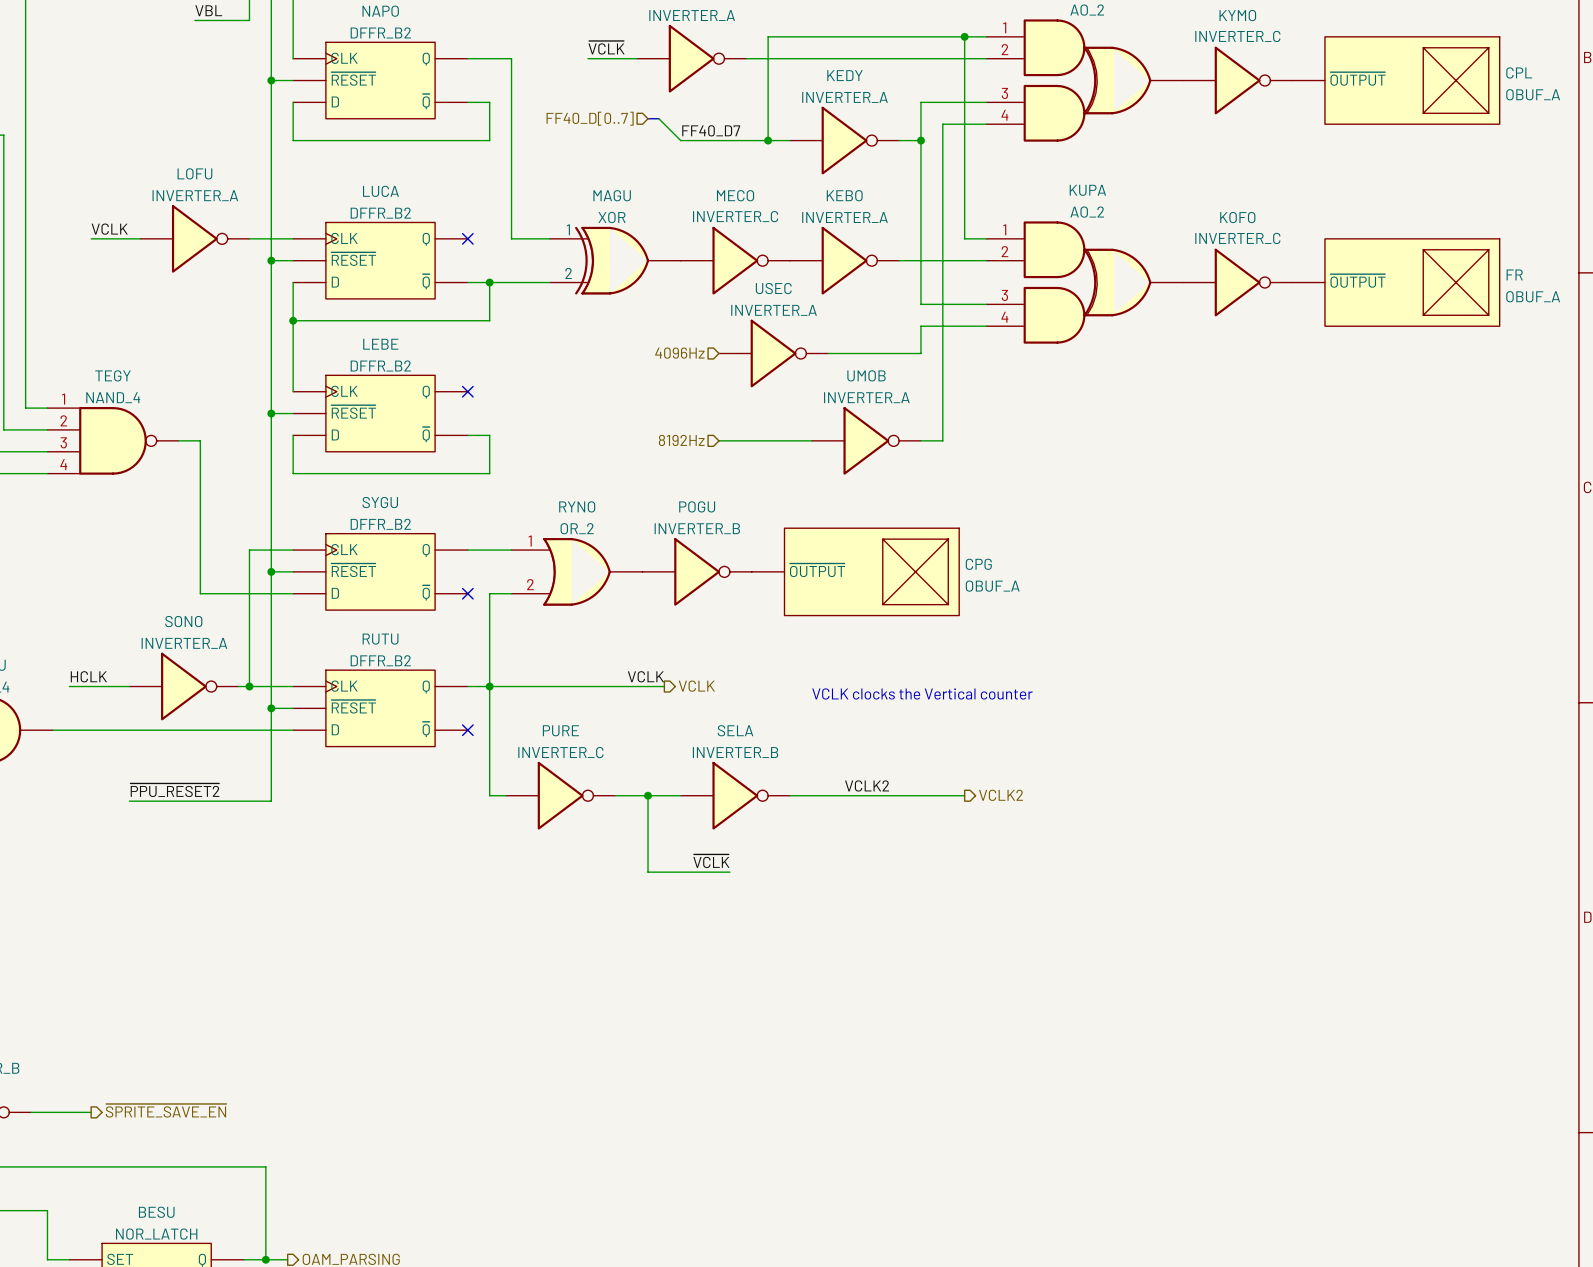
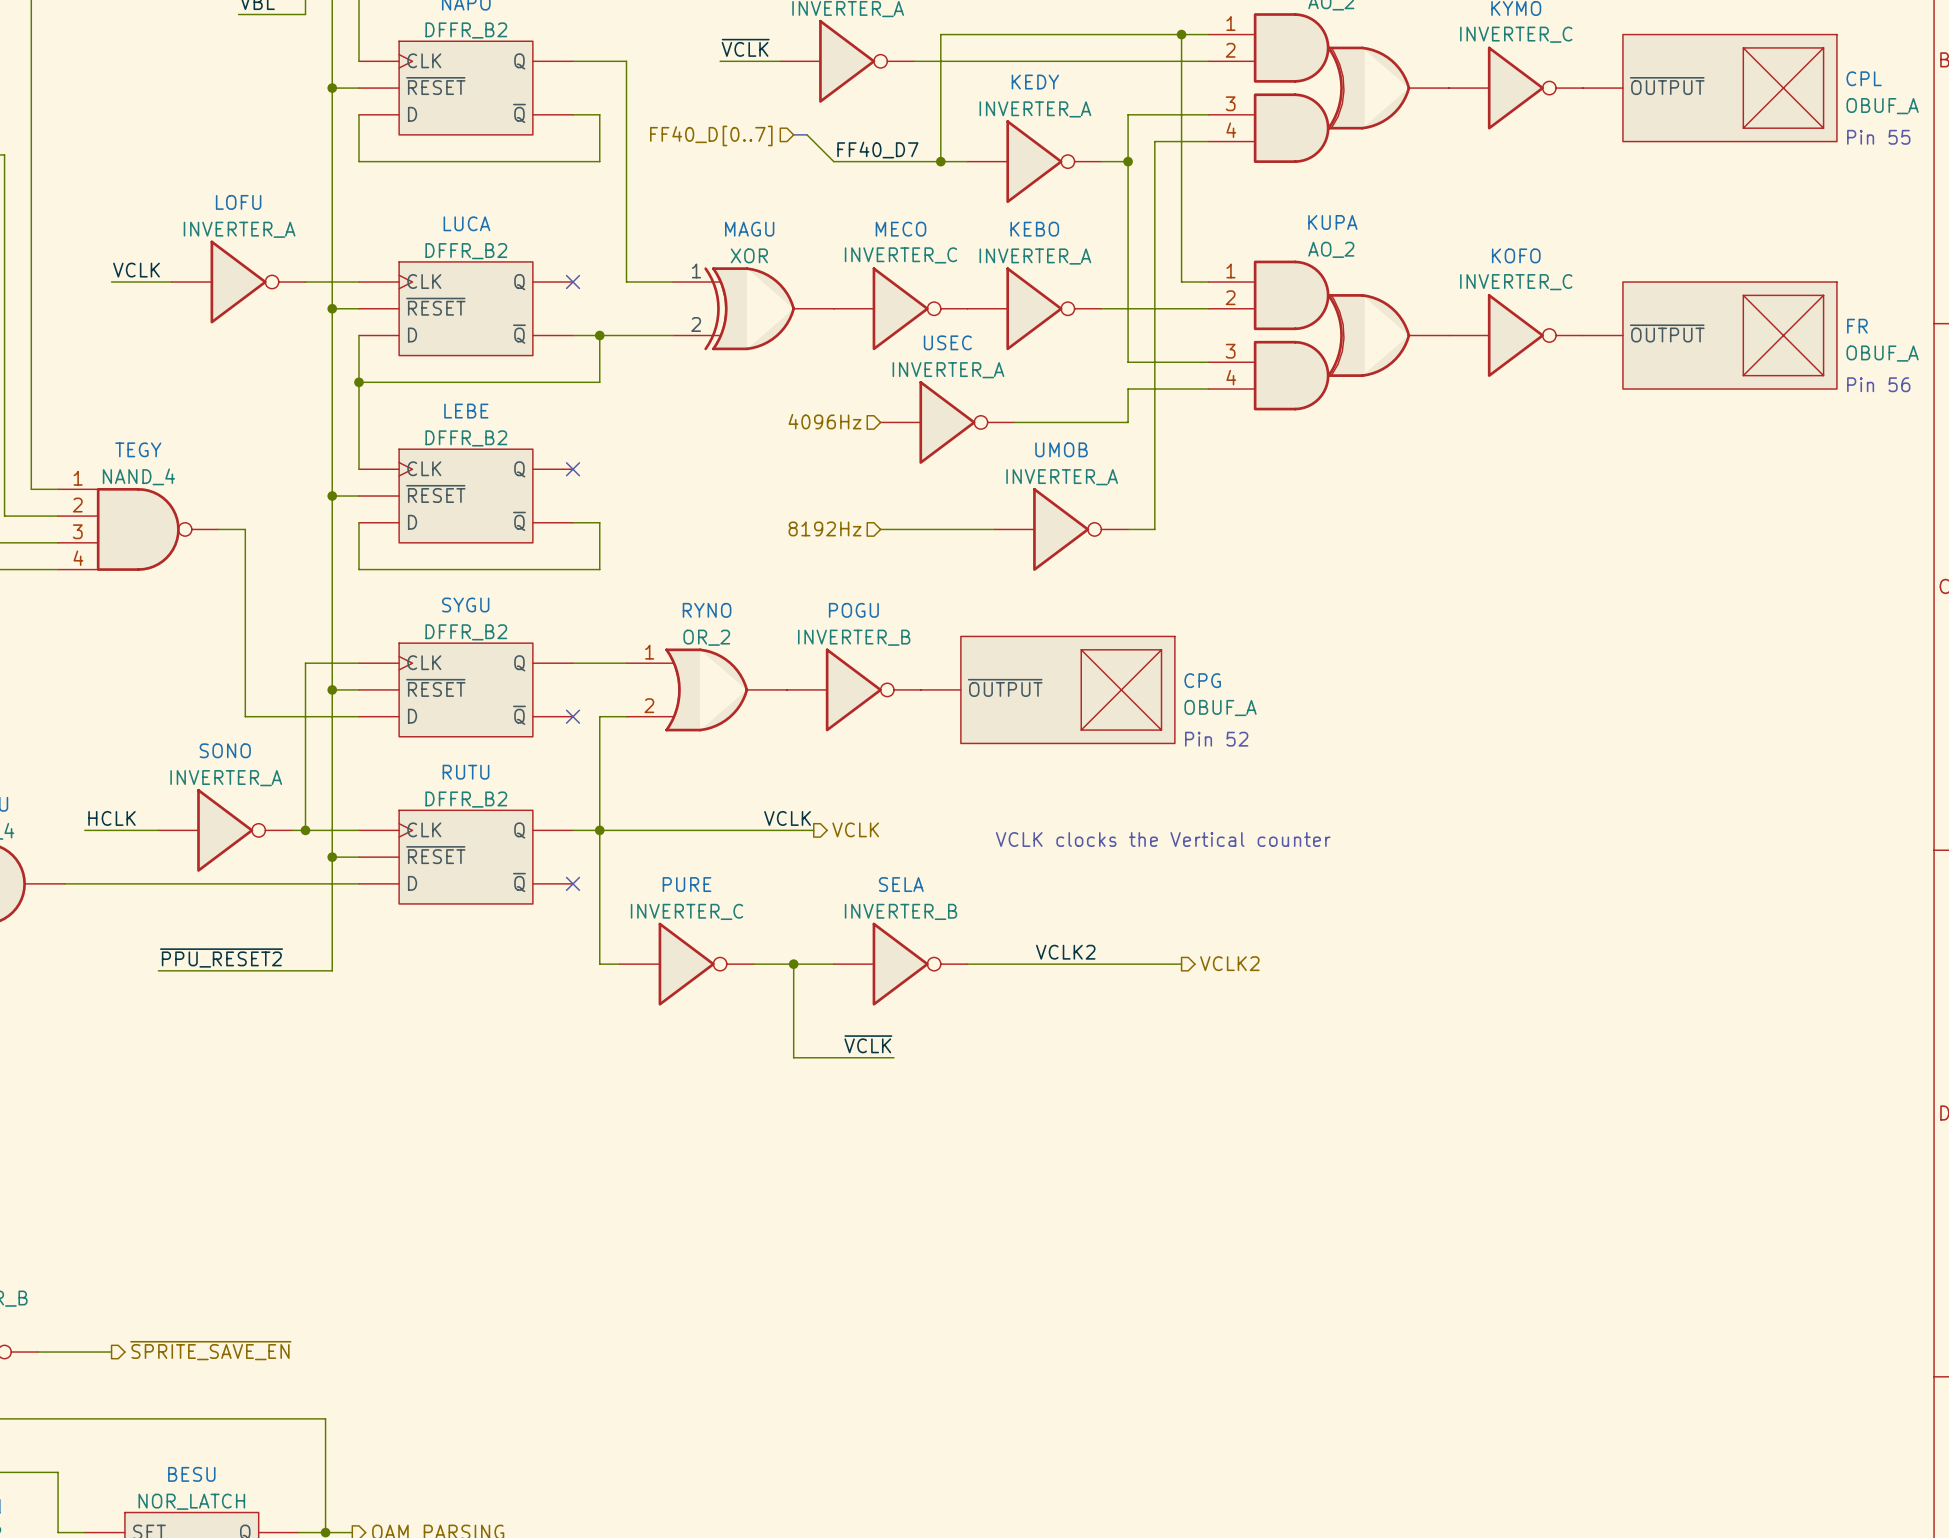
text: none -> Pin 55 (1878, 137)
text: none -> Pin 56 (1878, 384)
text: none -> Pin 52 (1216, 739)

